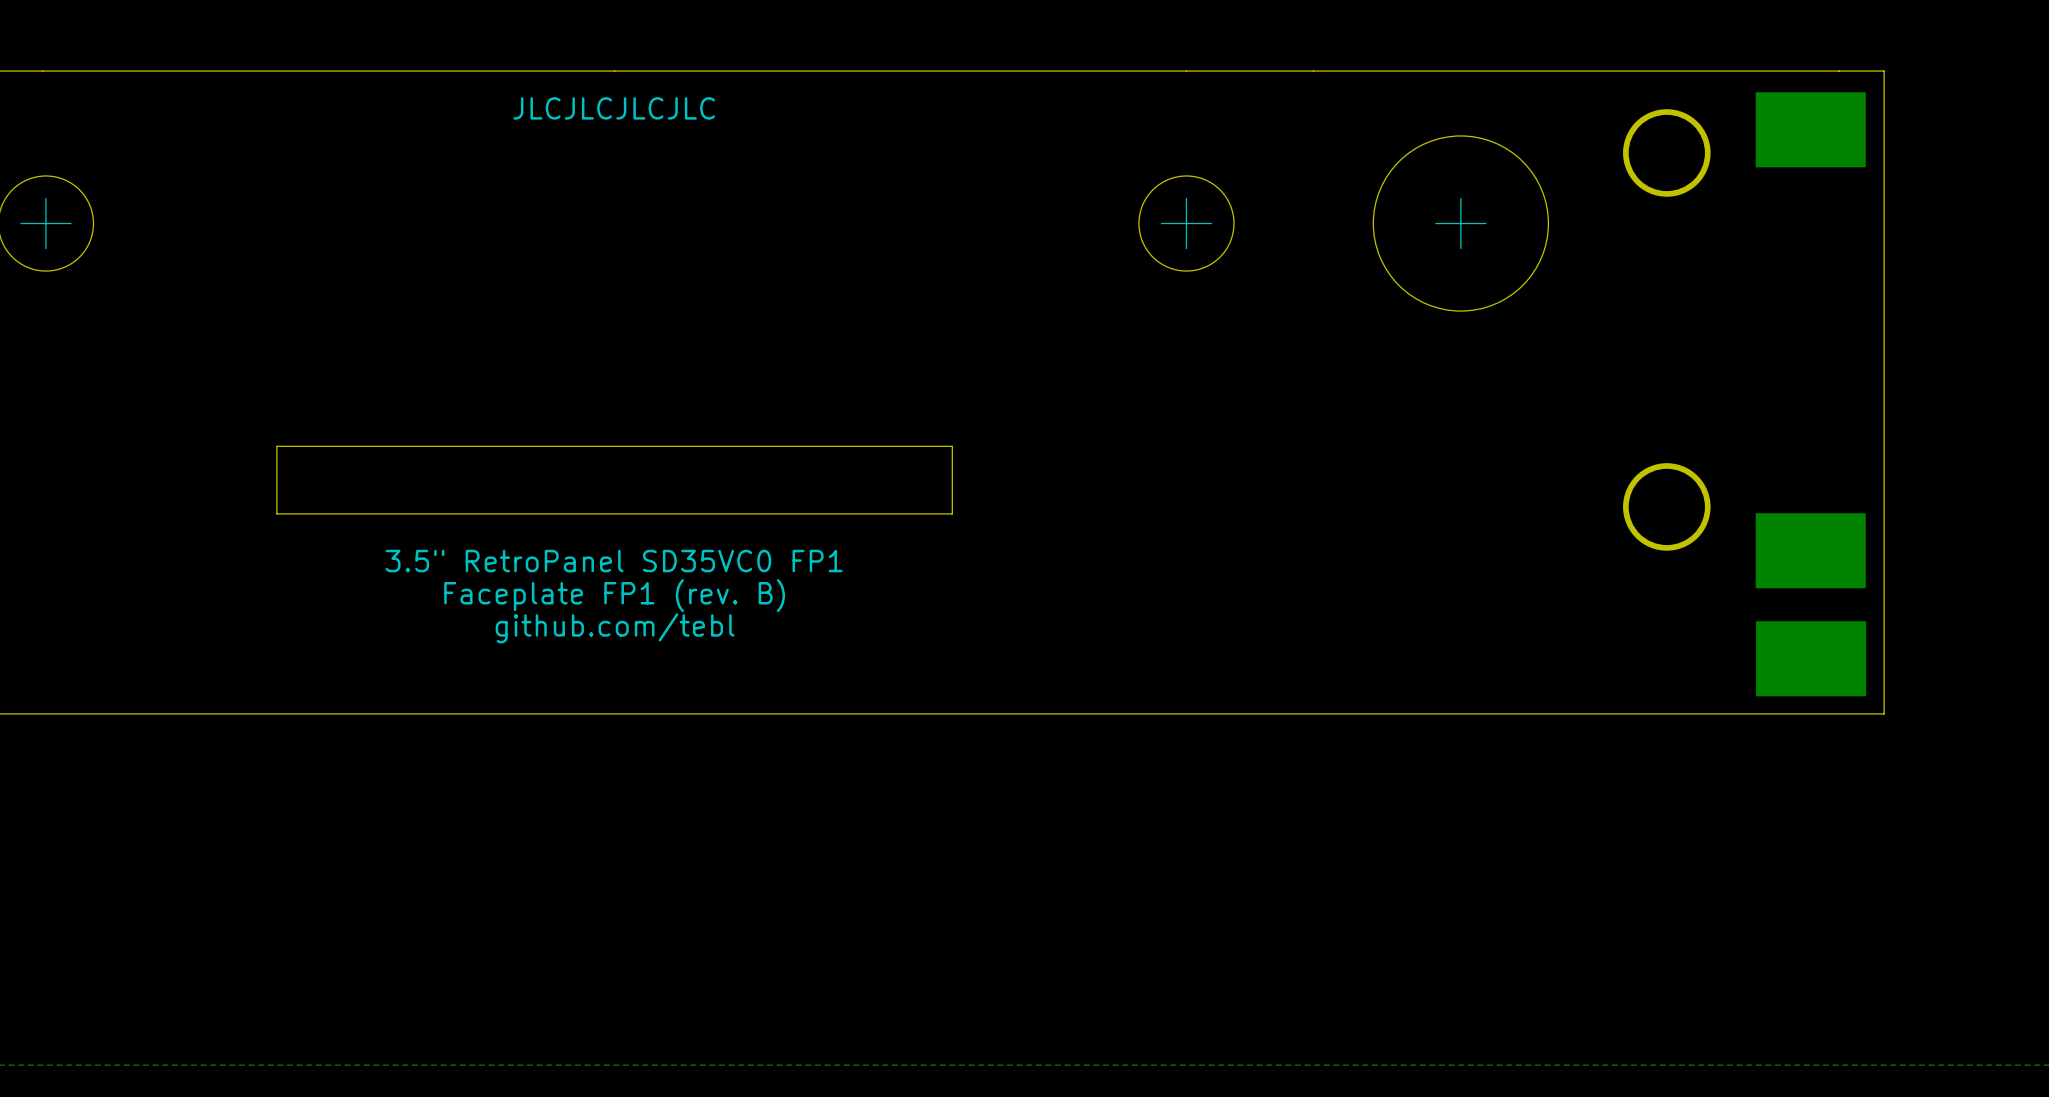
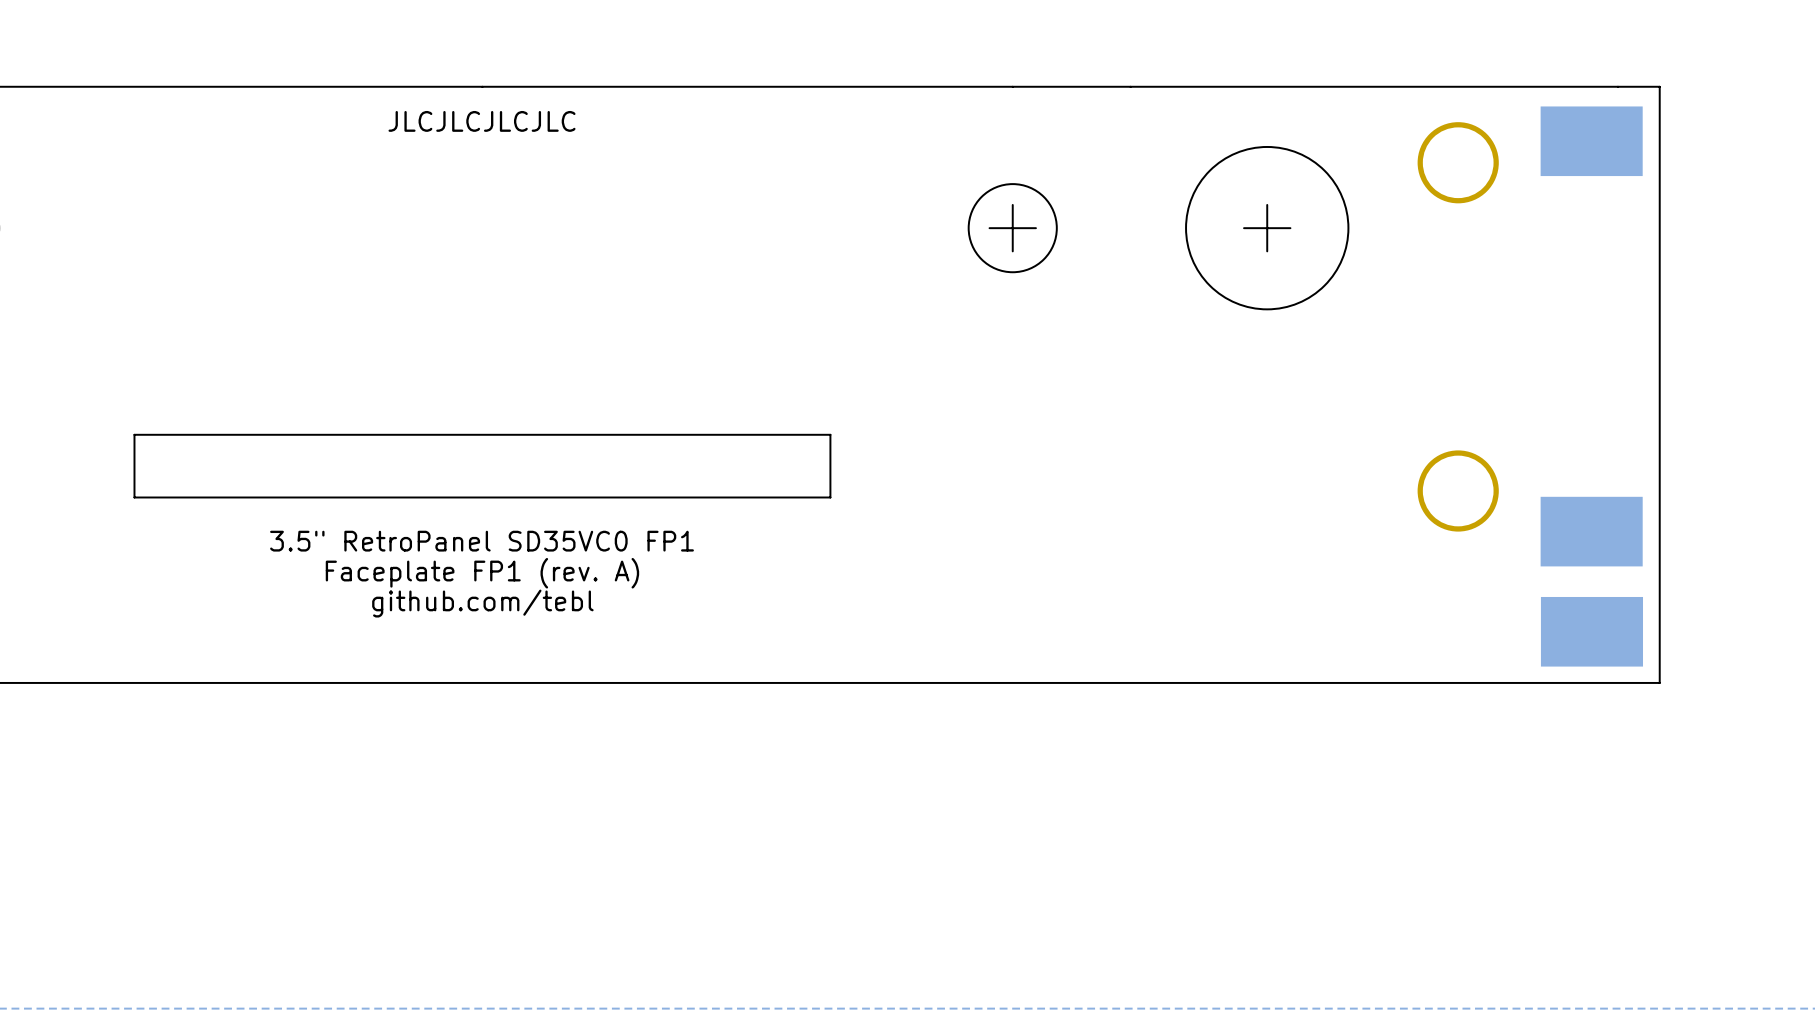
board edge: (276, 446) (276, 513) -> (169, 434) (134, 434) (134, 497) (169, 497)
board edge: (952, 446) (952, 513) -> (795, 434) (830, 434) (830, 497) (795, 497)
text: Faceplate FP1 (rev. B) (614, 595) -> Faceplate FP1 (rev. A) (482, 573)

